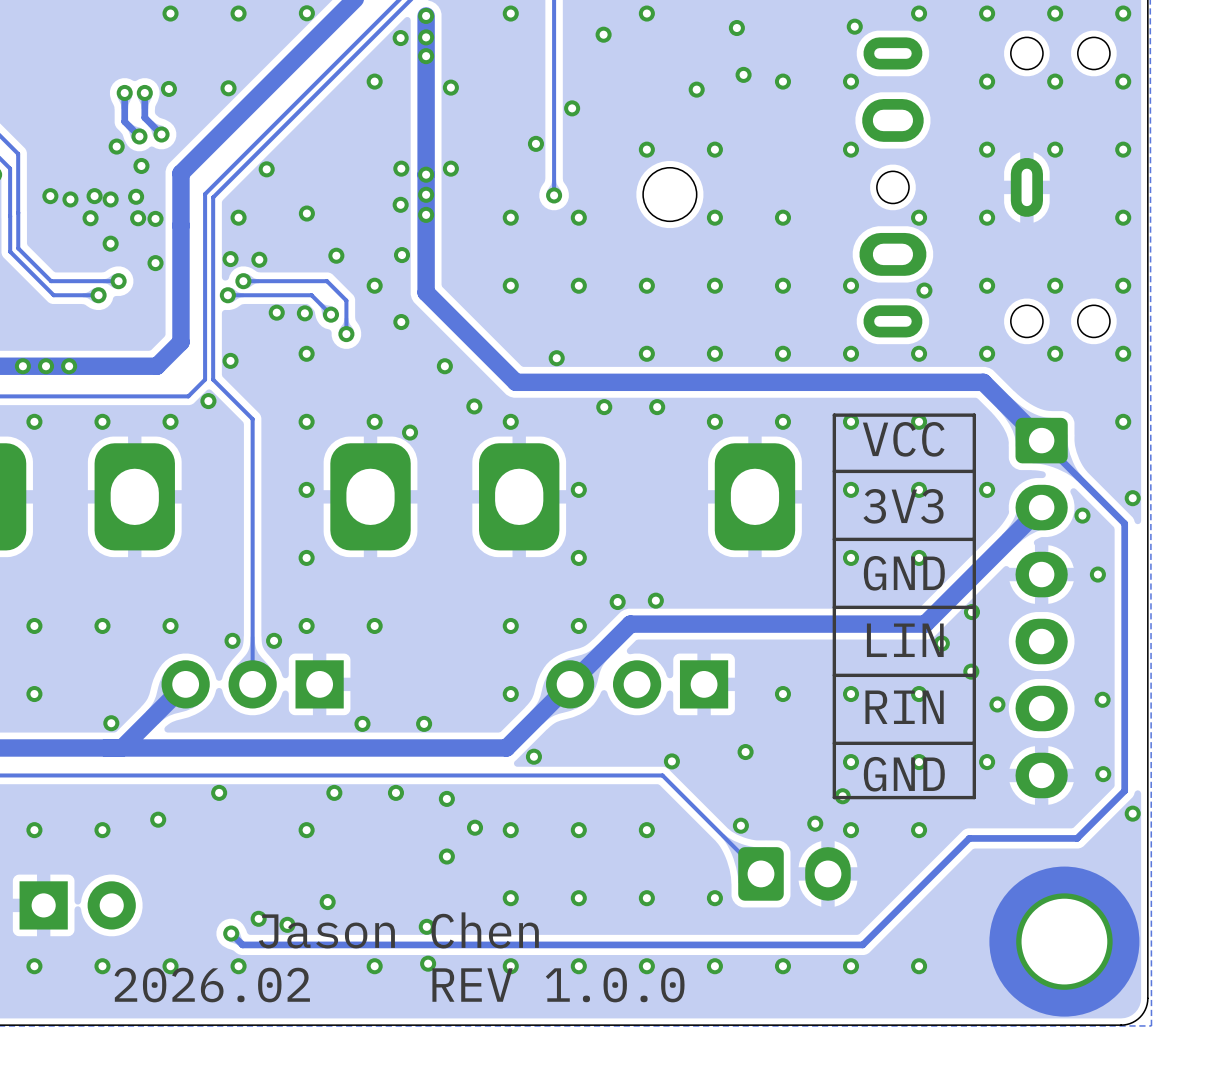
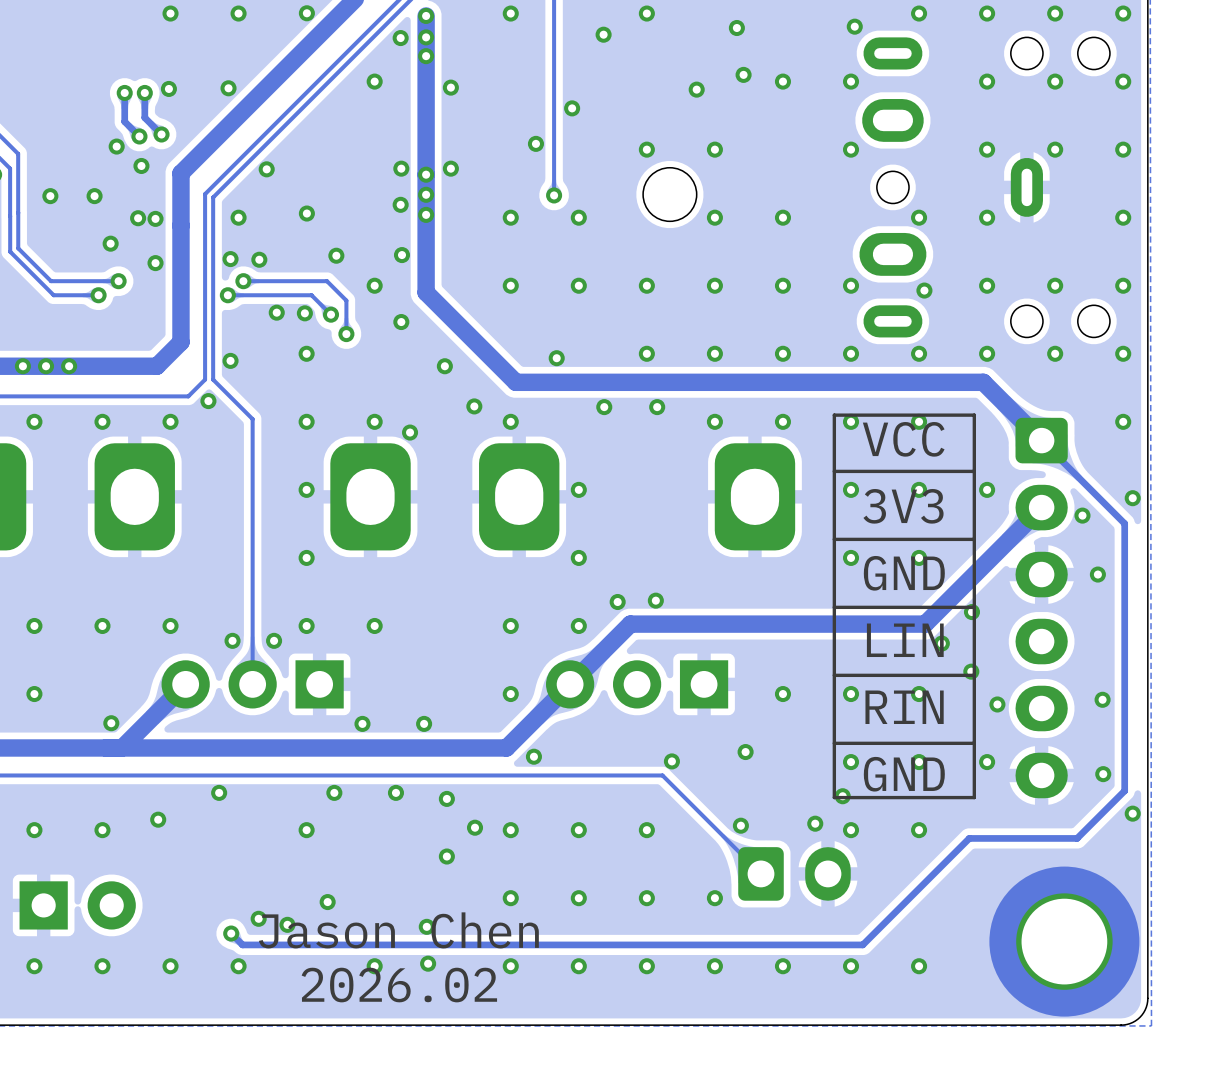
via: (136, 196) -> none
via: (70, 199) -> none
via: (110, 199) -> none
via: (90, 218) -> none
text: 2026.02 REV 1.0.0 (399, 985) -> 2026.02 (399, 985)

